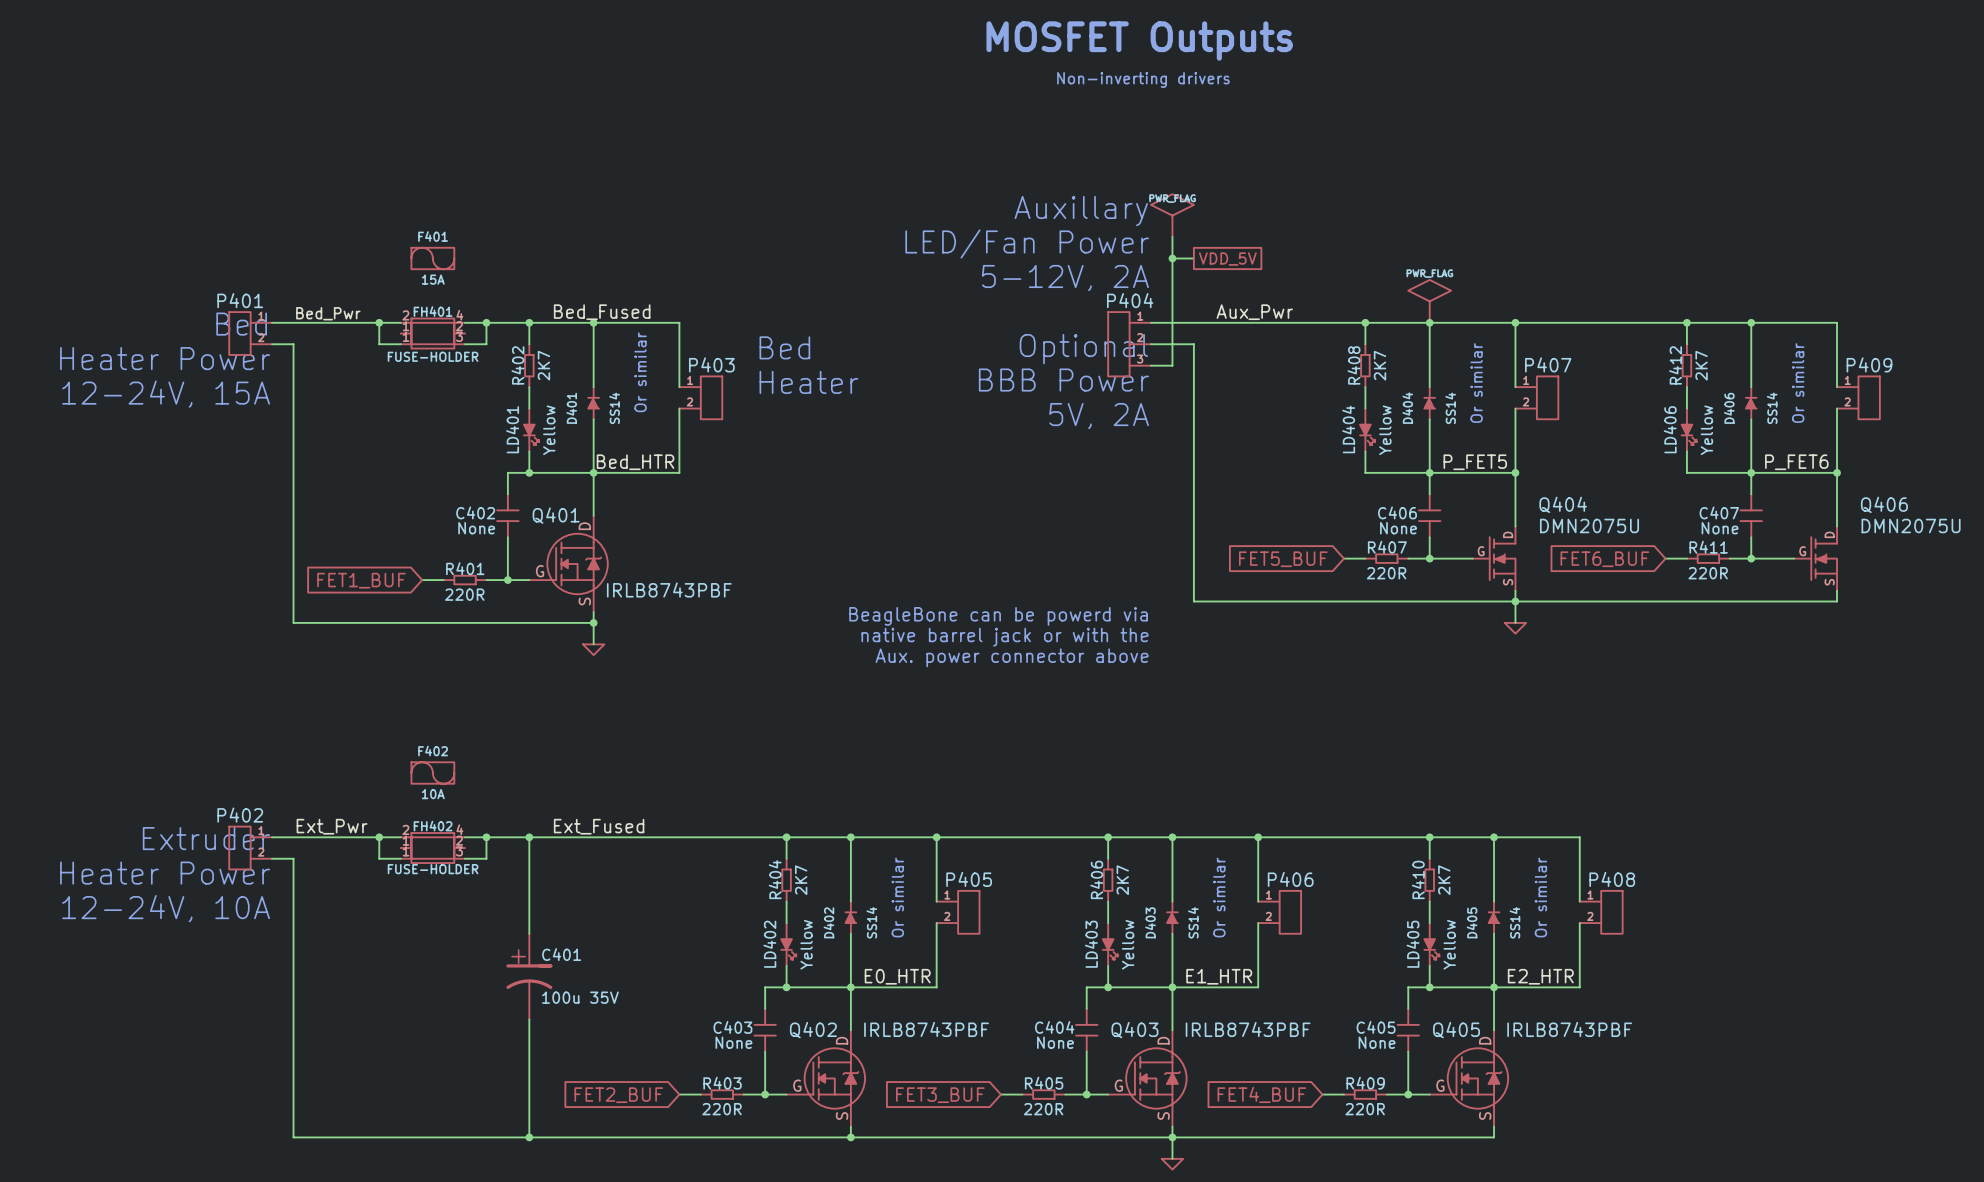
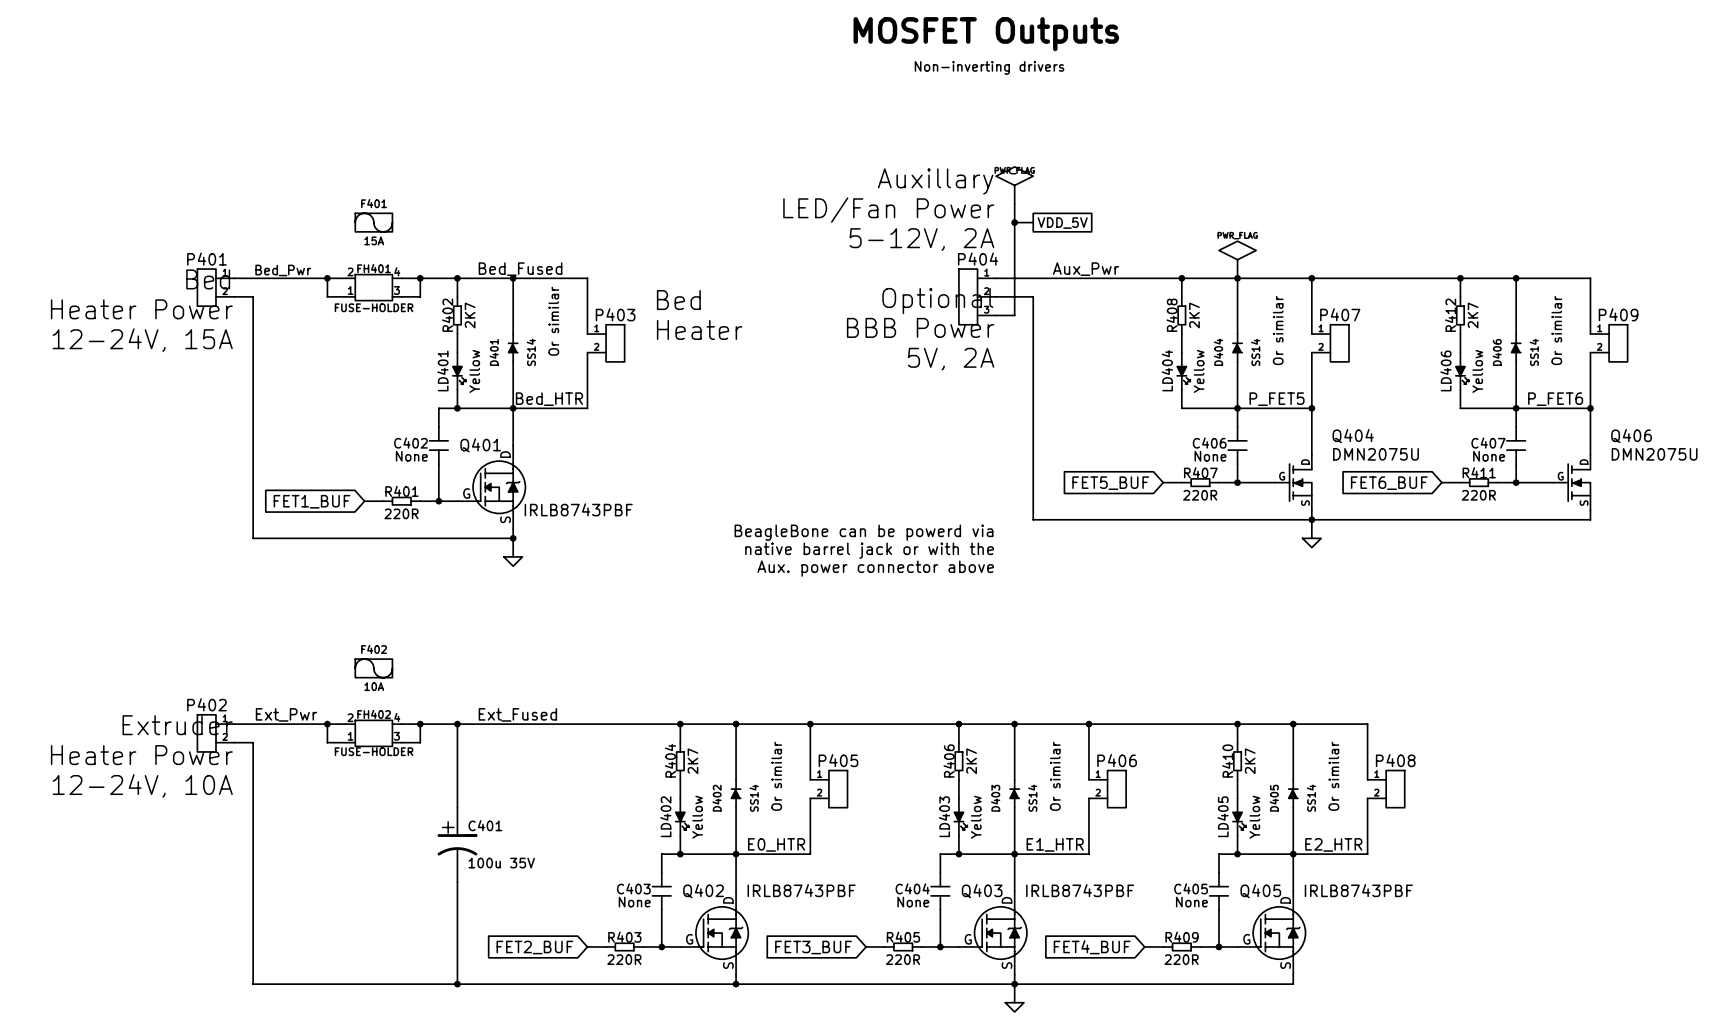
FH401 symbol: [400, 318, 466, 349] -> [346, 274, 402, 301]
FH402 symbol: [400, 833, 466, 864] -> [346, 720, 402, 747]

